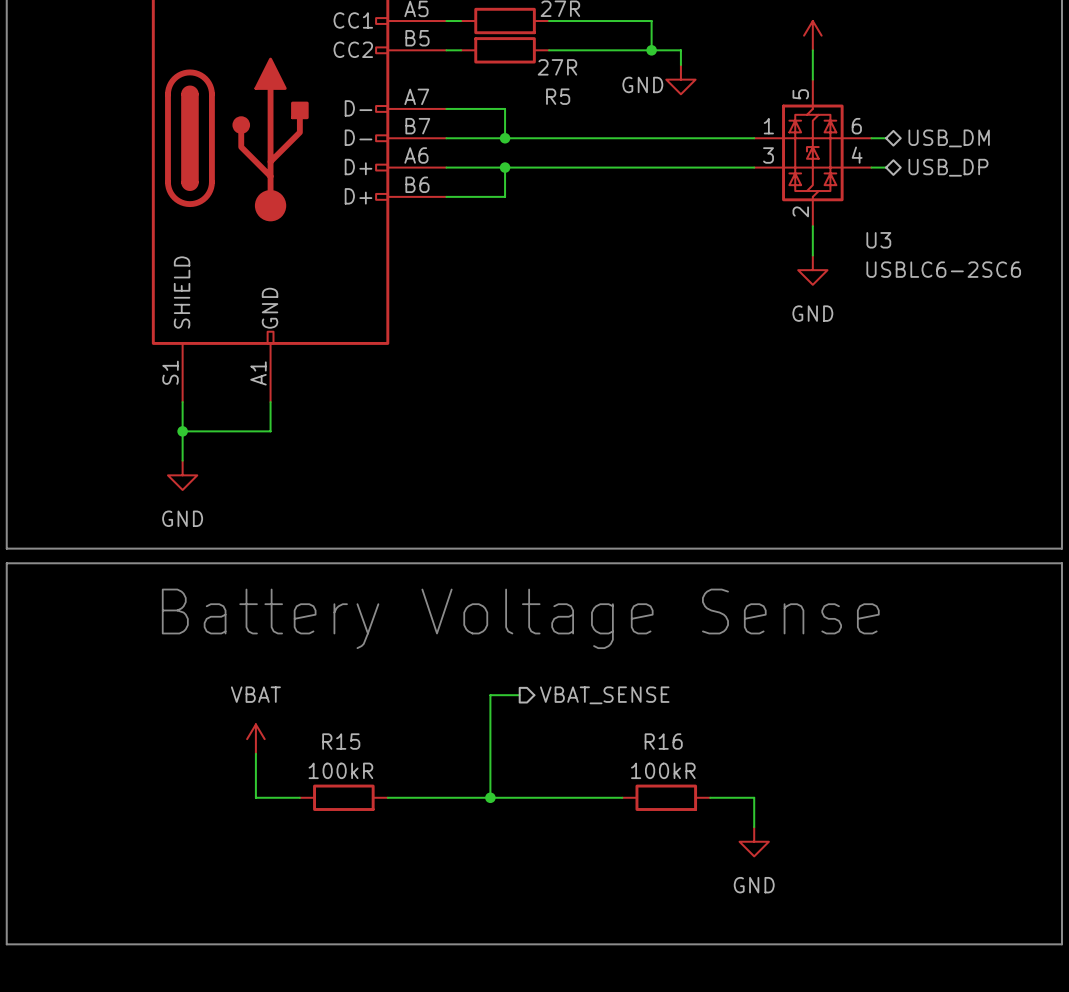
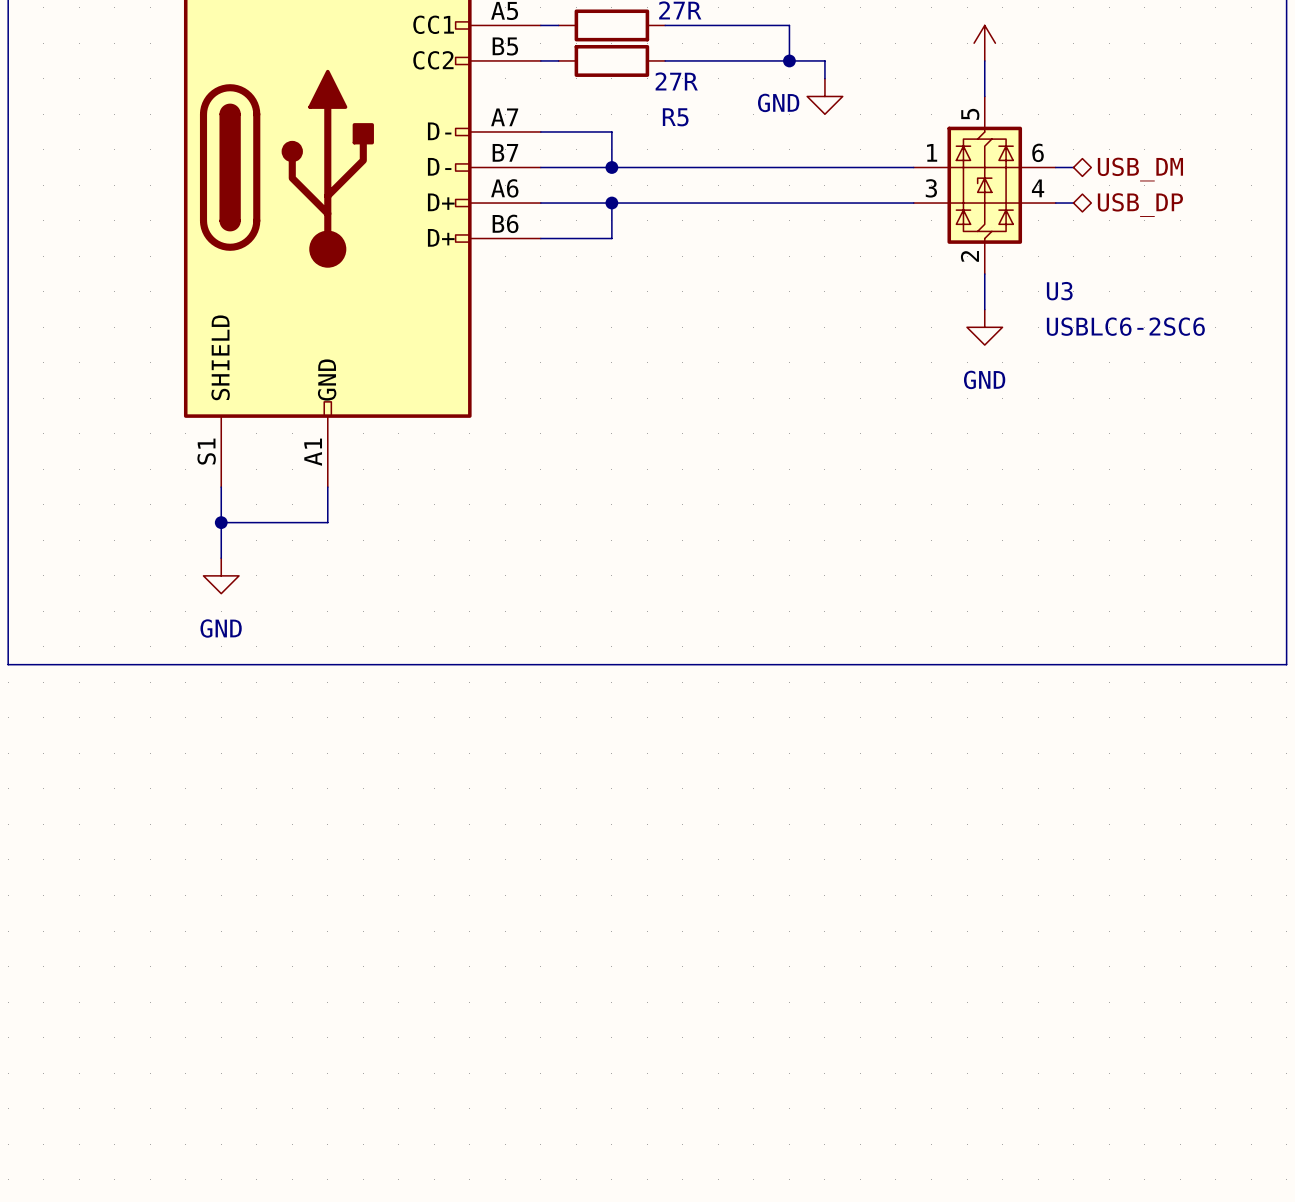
line: (6, 563) (1061, 563) (1061, 944) (6, 944) (6, 563) -> none
text: Battery Voltage Sense (520, 618) -> none
wire: (519, 695) (490, 695) (490, 797) -> none
hierarchical label: VBAT_SENSE (604, 695) -> none
power symbol: VBAT (255, 739) -> none
wire: (255, 753) (255, 797) (299, 797) -> none
R15: 100kR (343, 797) -> none
wire: (387, 797) (622, 797) -> none
junction: (490, 797) -> none
R16: 100kR (666, 797) -> none
wire: (710, 797) (754, 797) (754, 827) -> none
power symbol: GND (754, 841) -> none

